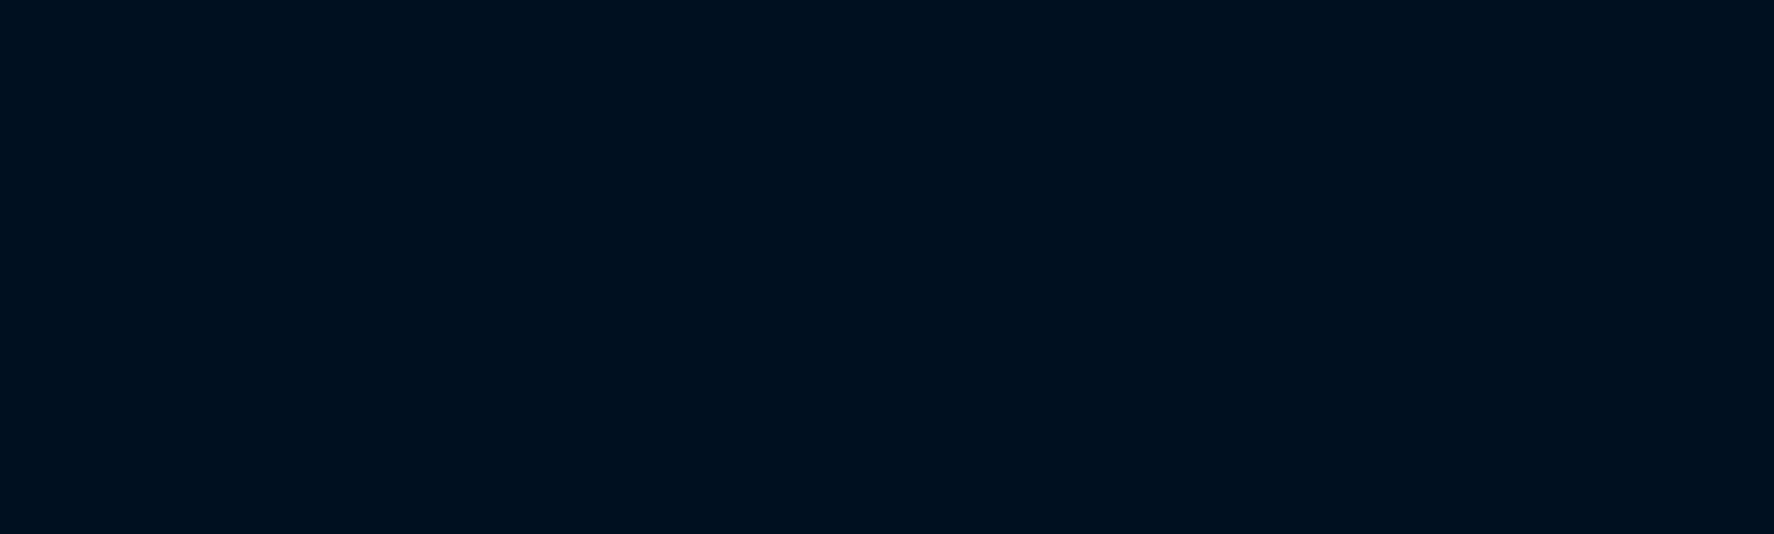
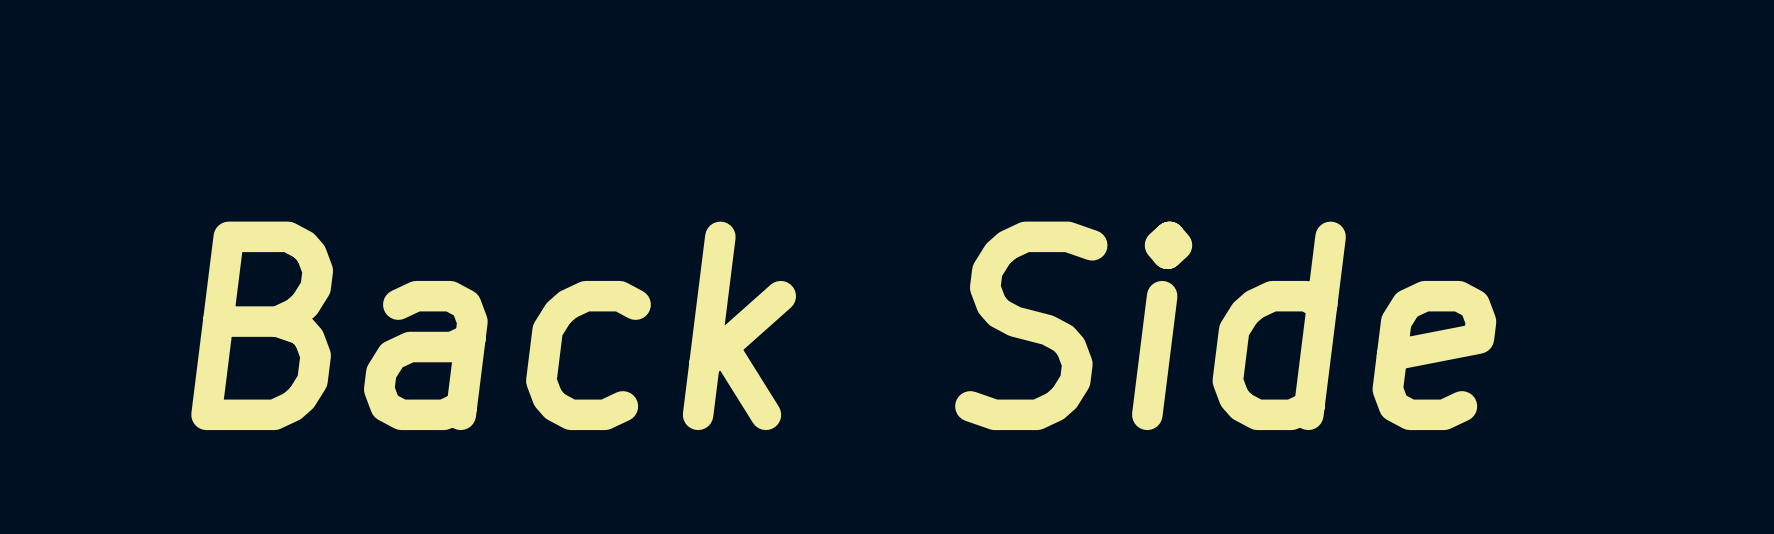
text: none -> Back Side (843, 325)

